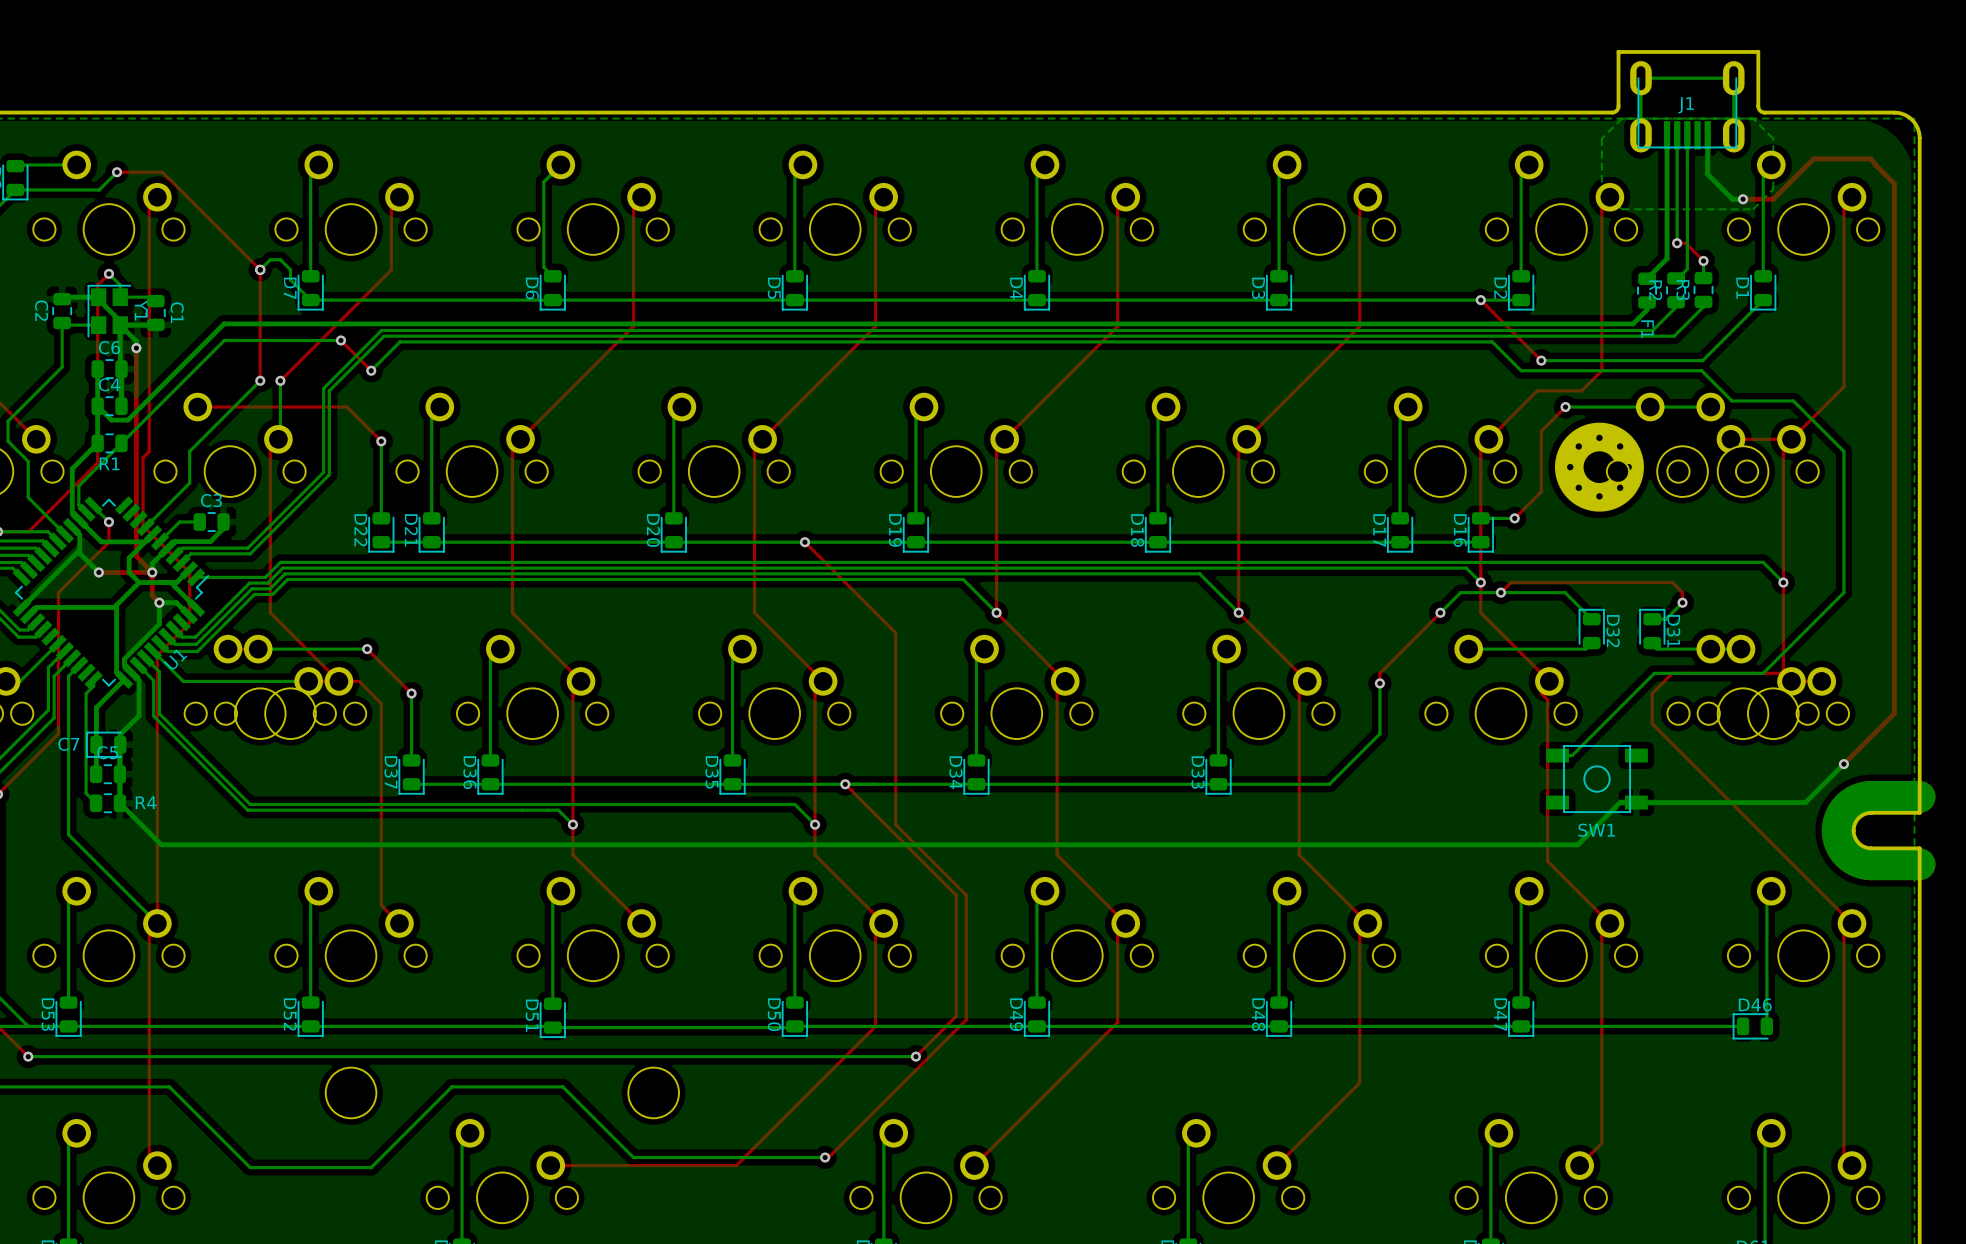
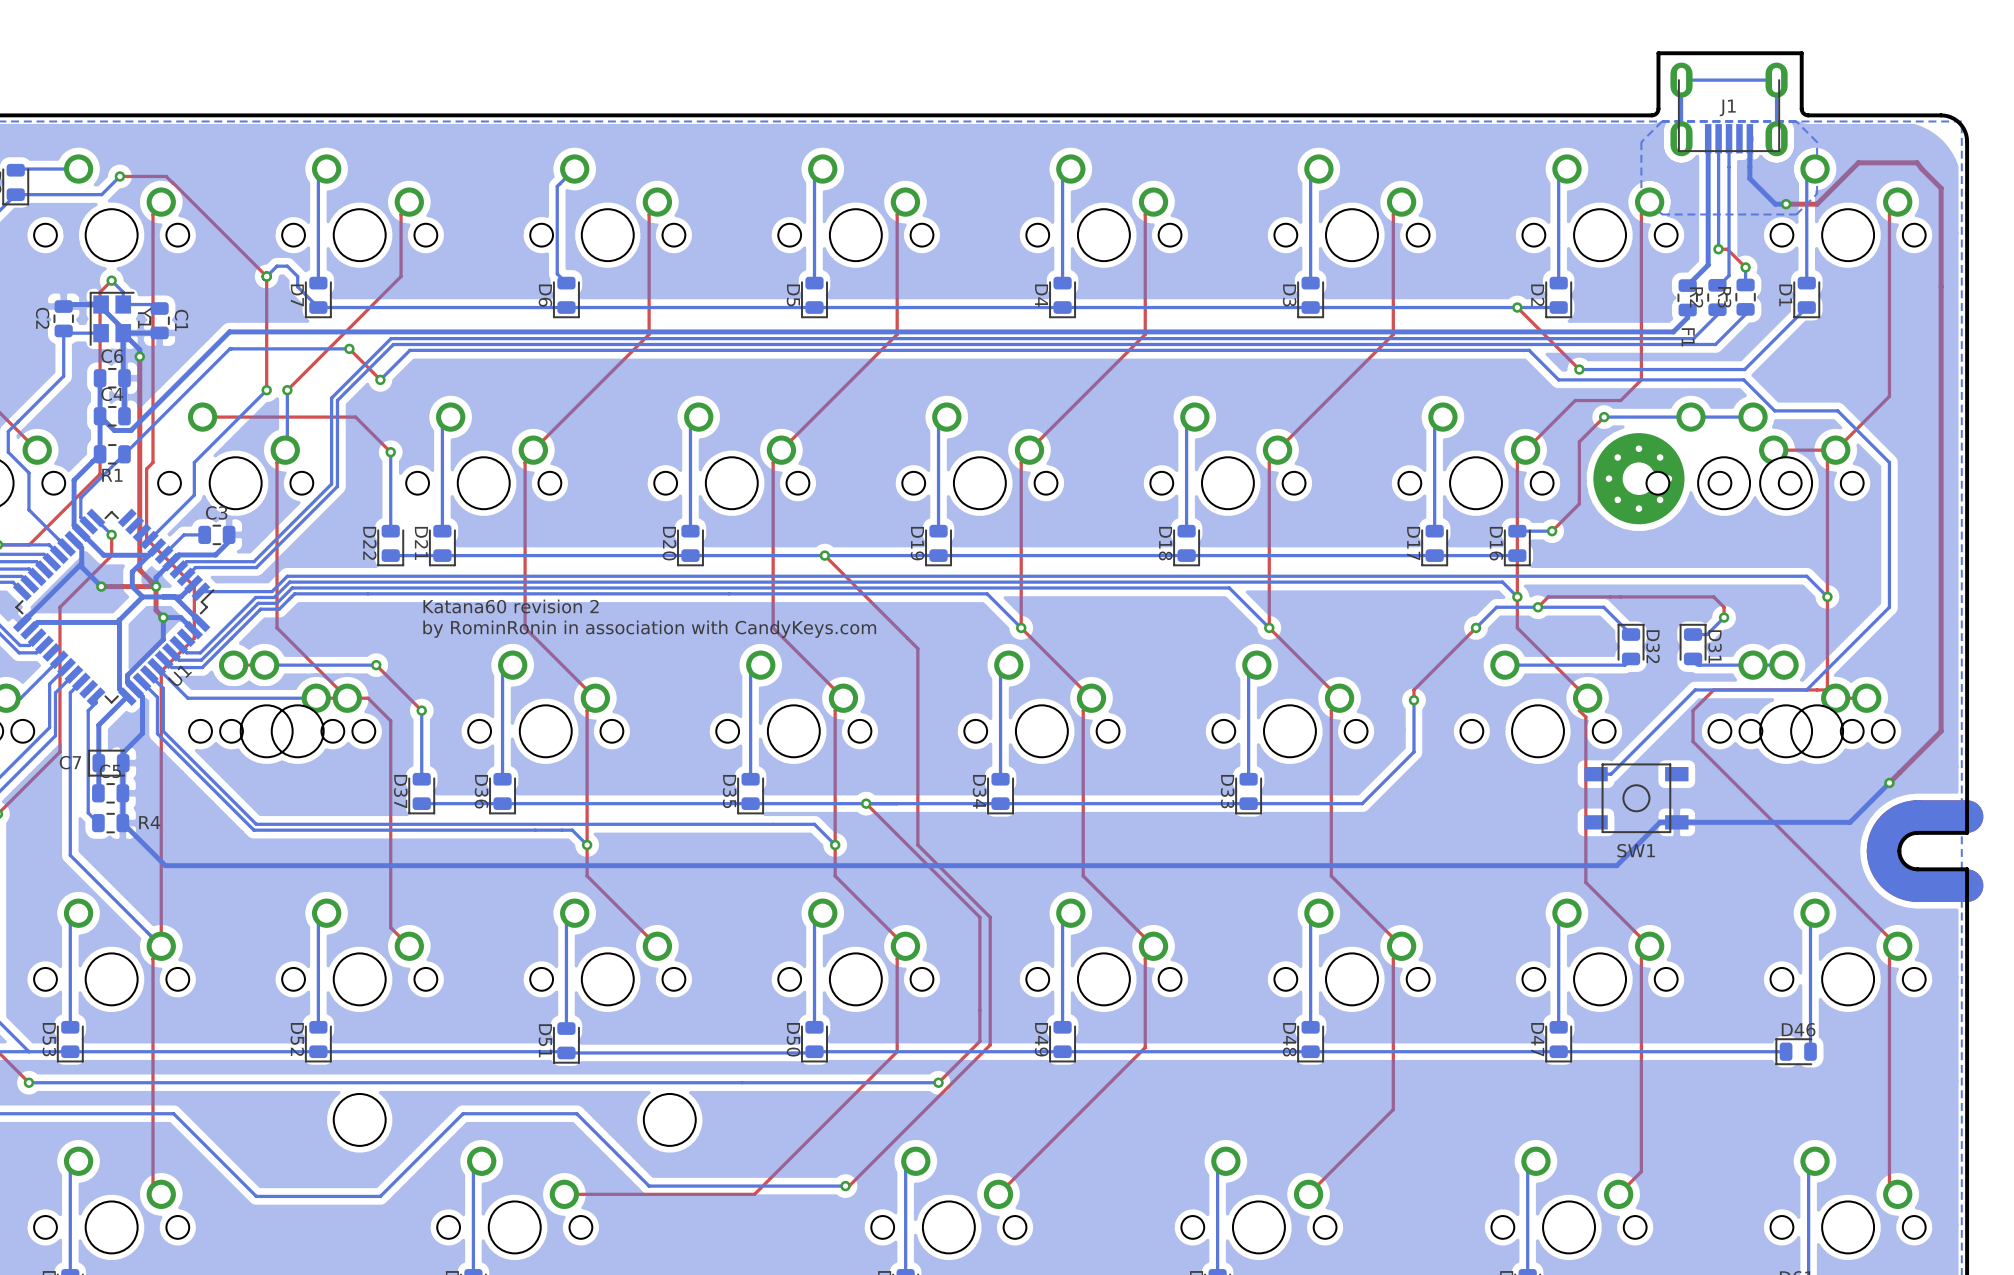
text: none -> Katana60 revision 2 (511, 606)
text: none -> by RominRonin in association with CandyKeys.com (649, 629)

